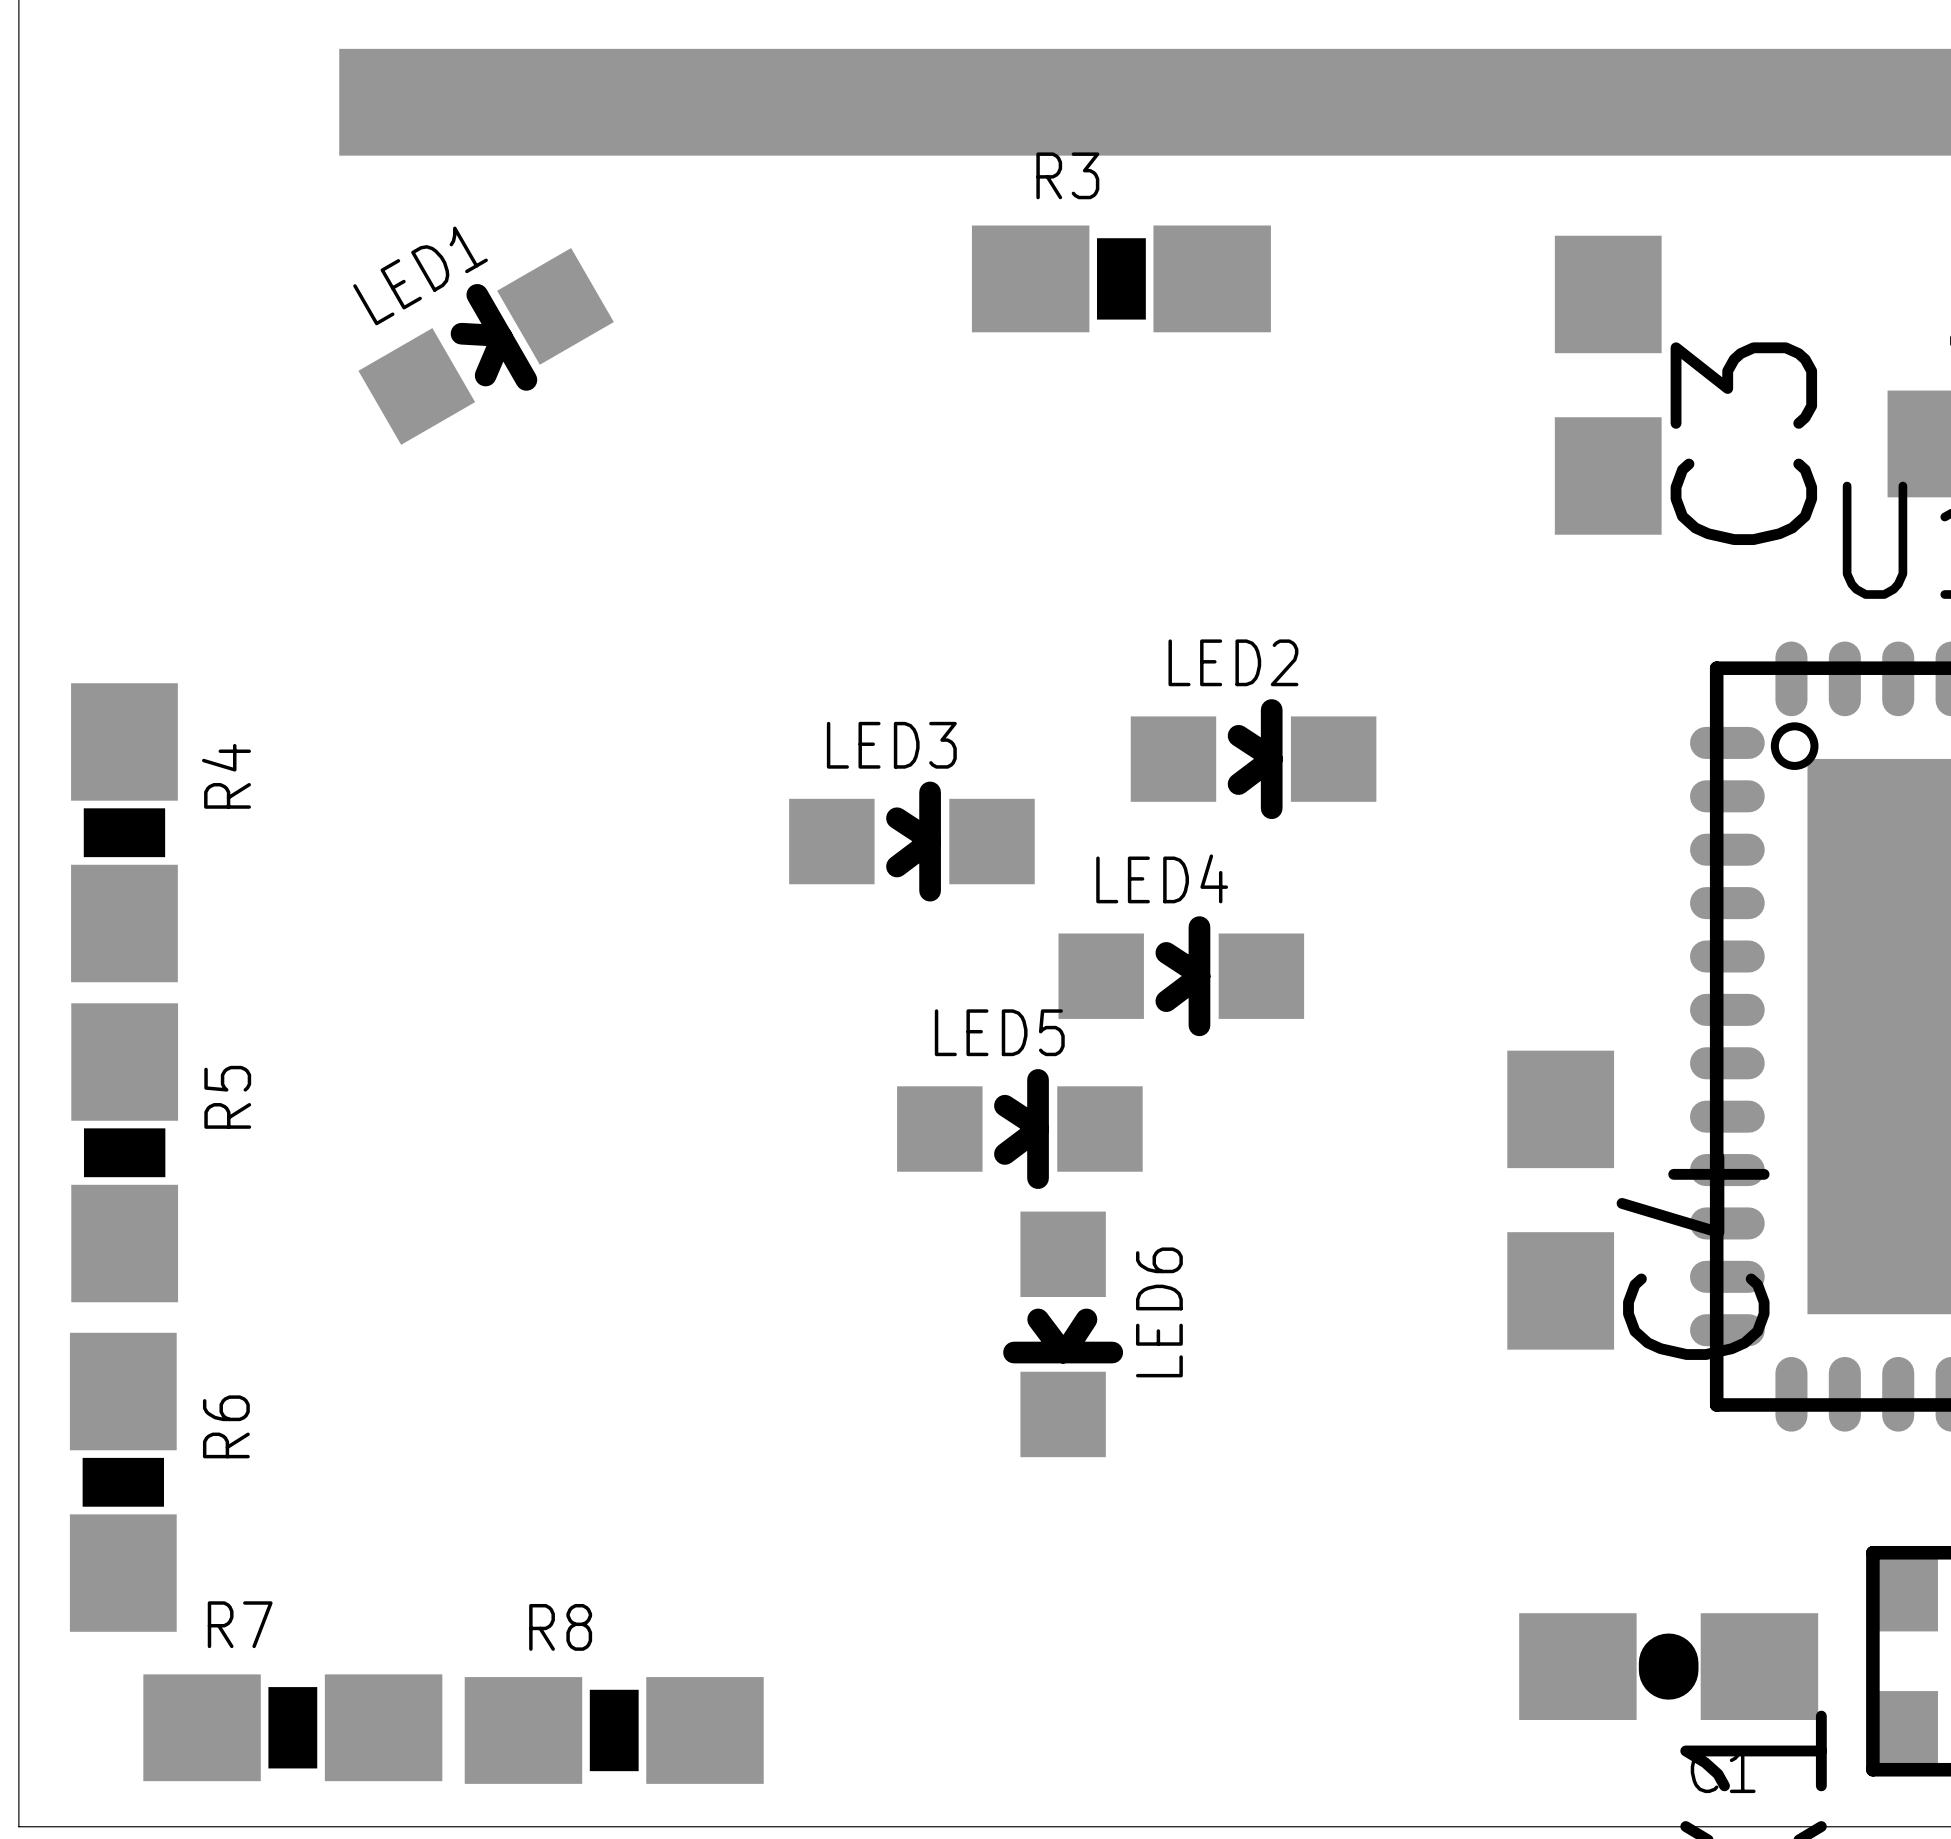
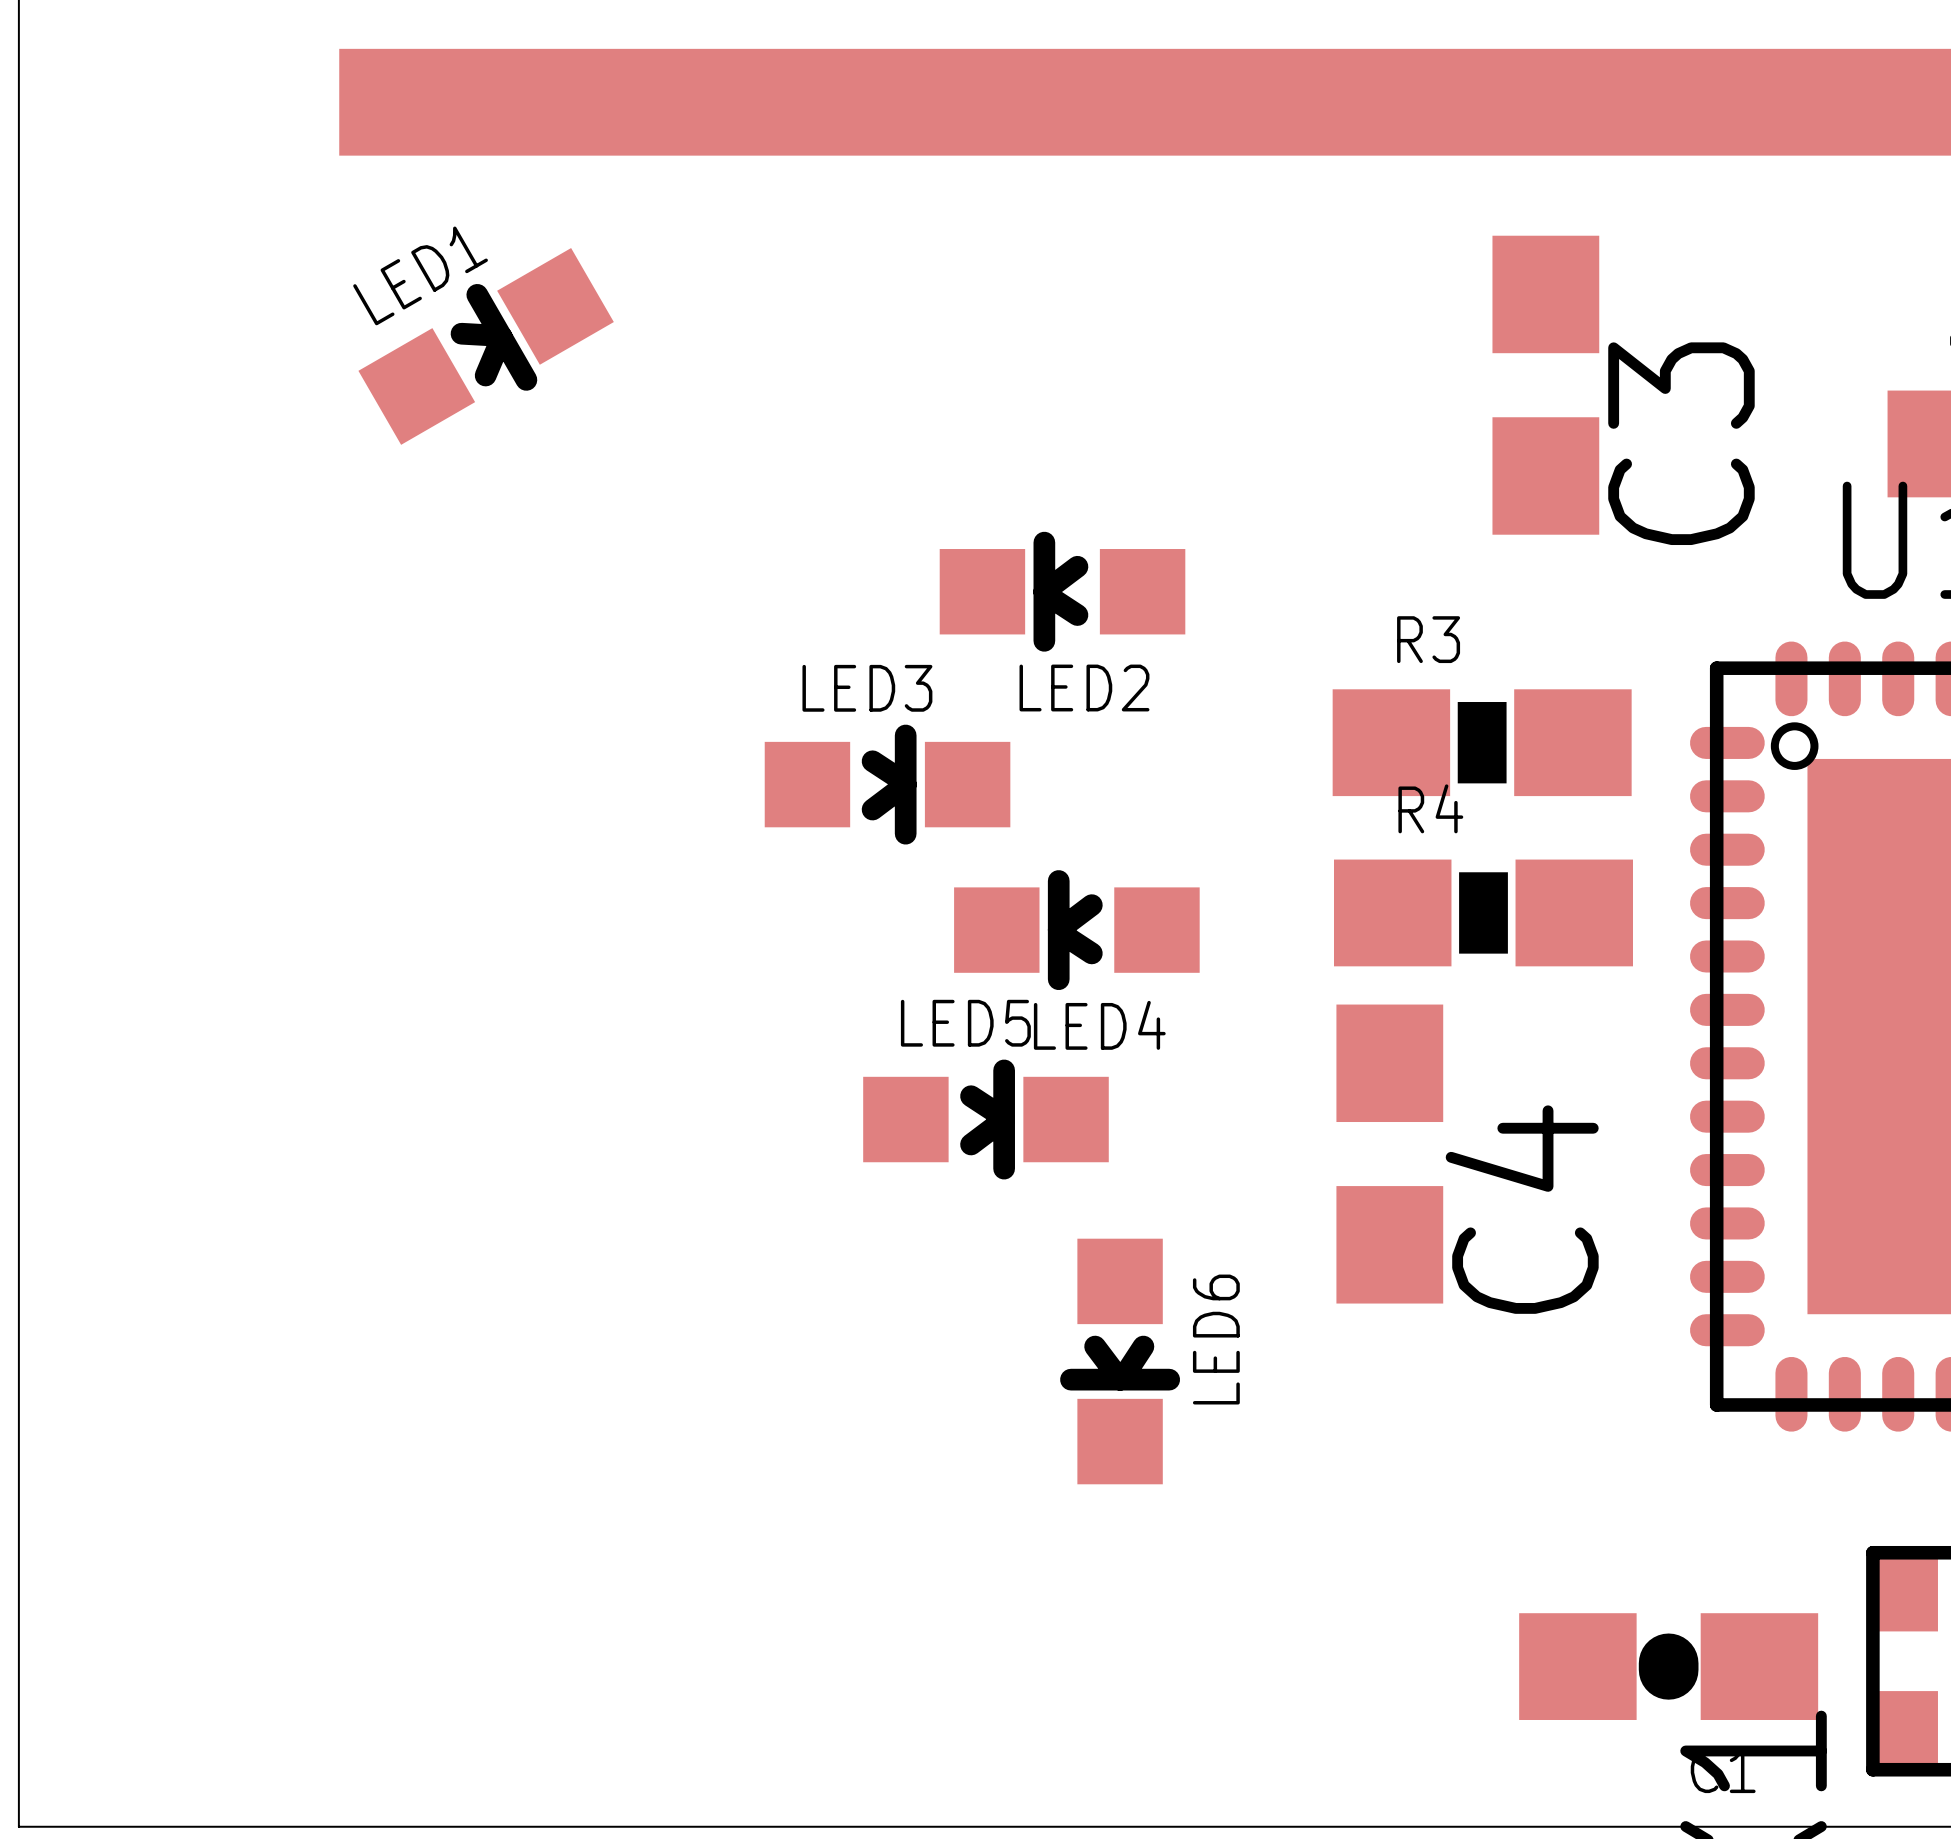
R3 position: (1121, 278) -> (1482, 742)
C3 position: (1608, 385) -> (1545, 385)
LED2 rotation: 0° (1253, 759) -> 180° (1062, 591)
LED2 position: (1253, 759) -> (1062, 591)
R4 rotation: 0° (124, 832) -> 90° clockwise (1483, 912)
R4 position: (124, 832) -> (1483, 912)
LED3 position: (911, 841) -> (887, 784)
LED4 rotation: 0° (1181, 976) -> 180° (1076, 930)
LED5 position: (1019, 1129) -> (985, 1119)
R5: (124, 1152) -> none
C4 position: (1560, 1200) -> (1389, 1154)
LED6 position: (1063, 1334) -> (1120, 1361)
R6: (123, 1482) -> none
R7: (292, 1727) -> none
R8: (614, 1730) -> none

